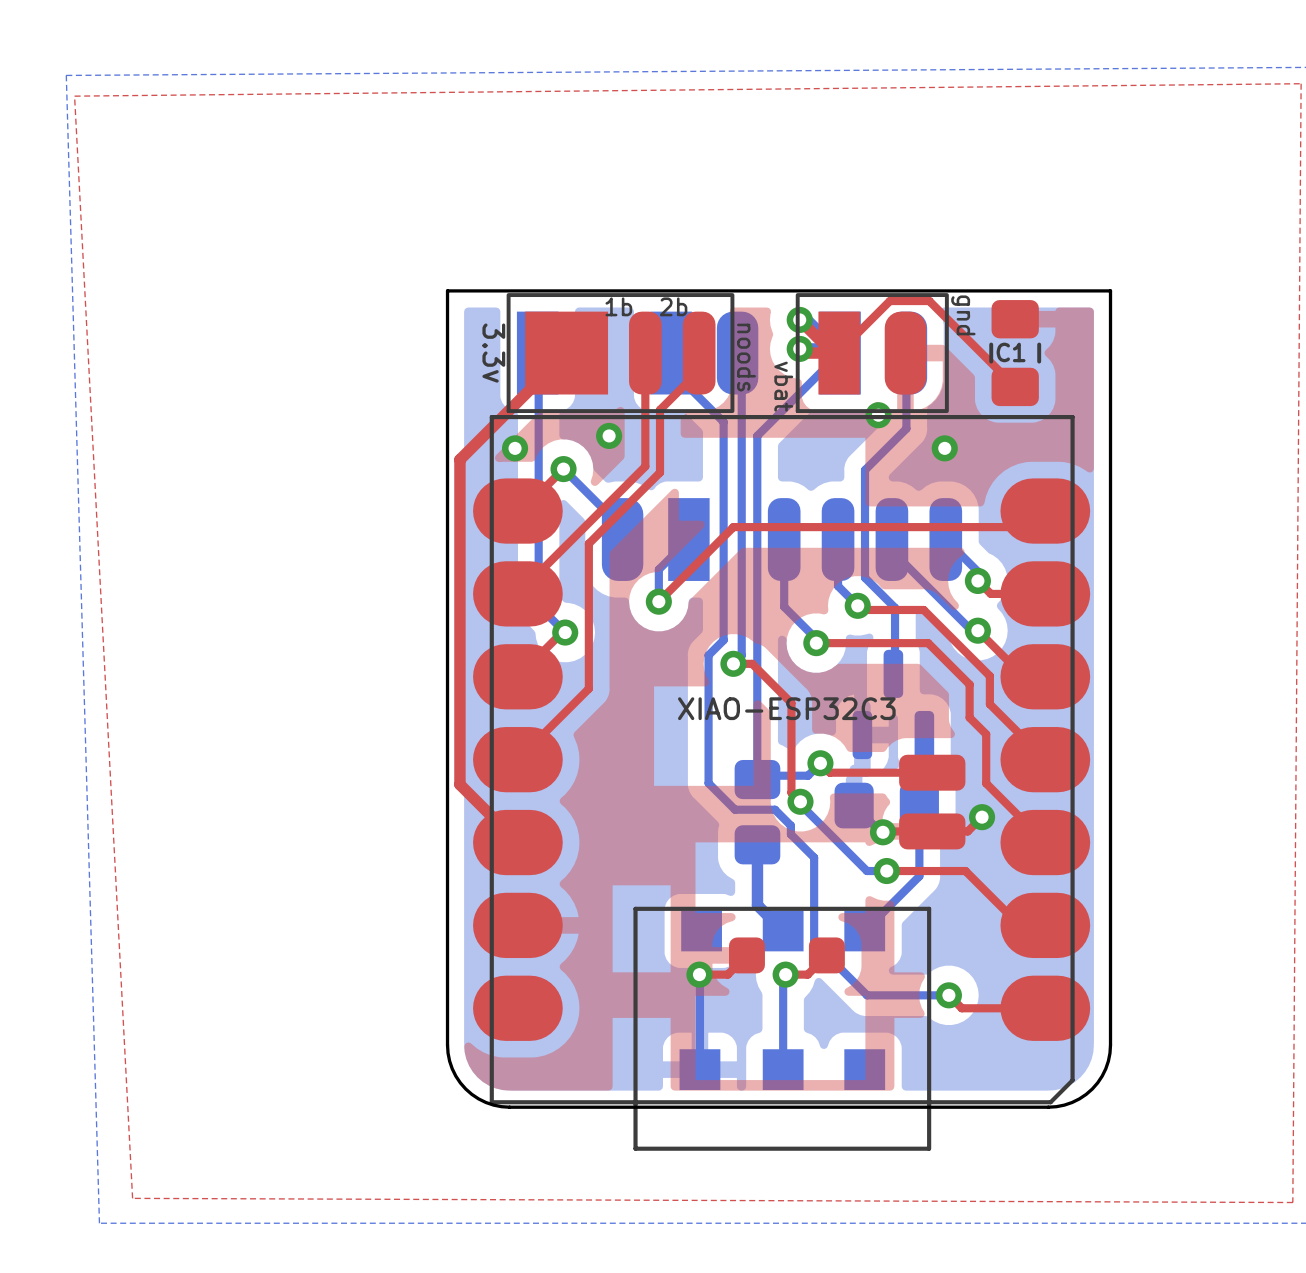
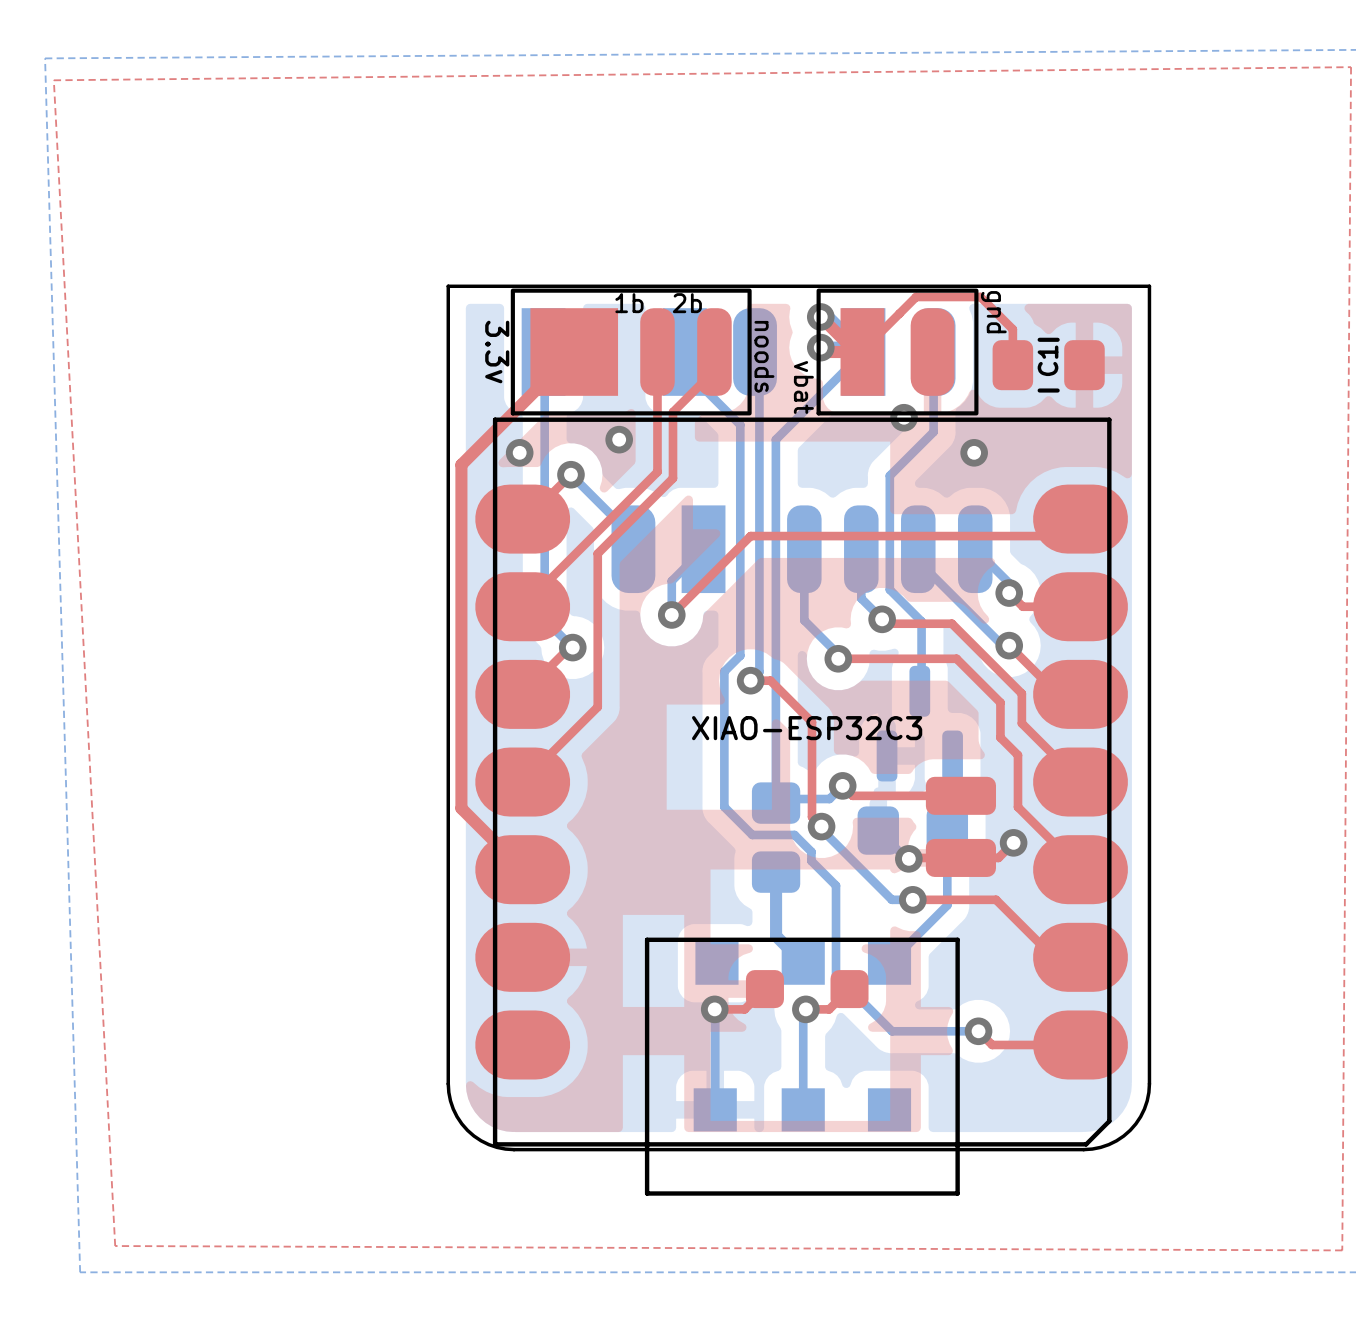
top track: (929, 301) (1015, 386) -> (957, 296) (980, 296) (1012, 329) (1012, 365)
C1 rotation: 0° (1015, 353) -> 90° clockwise (1048, 365)

